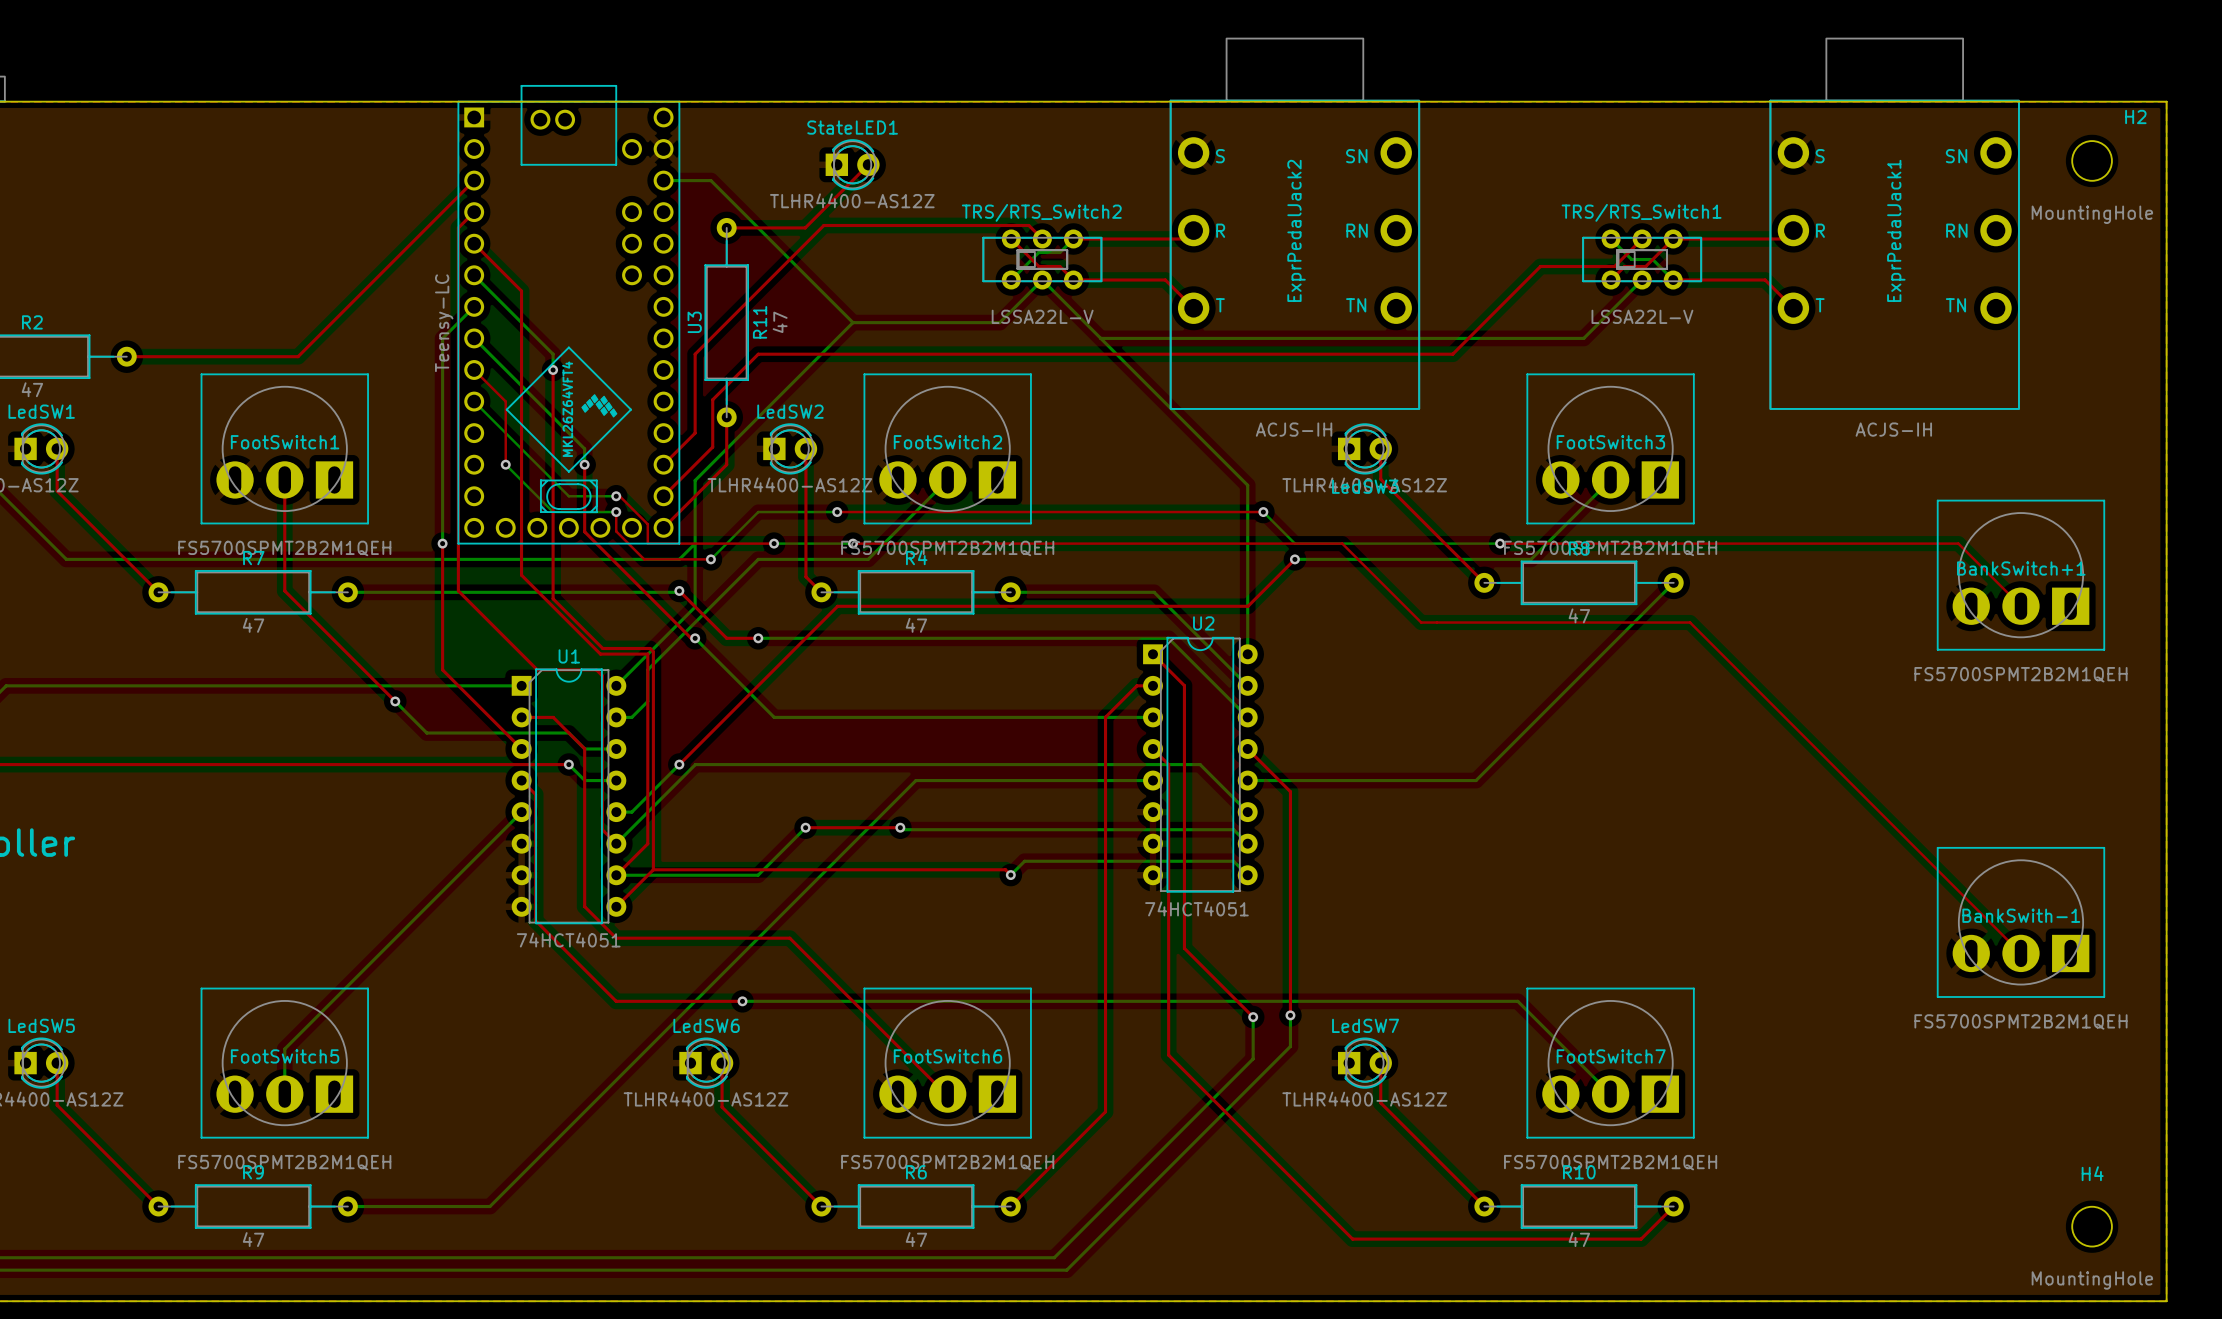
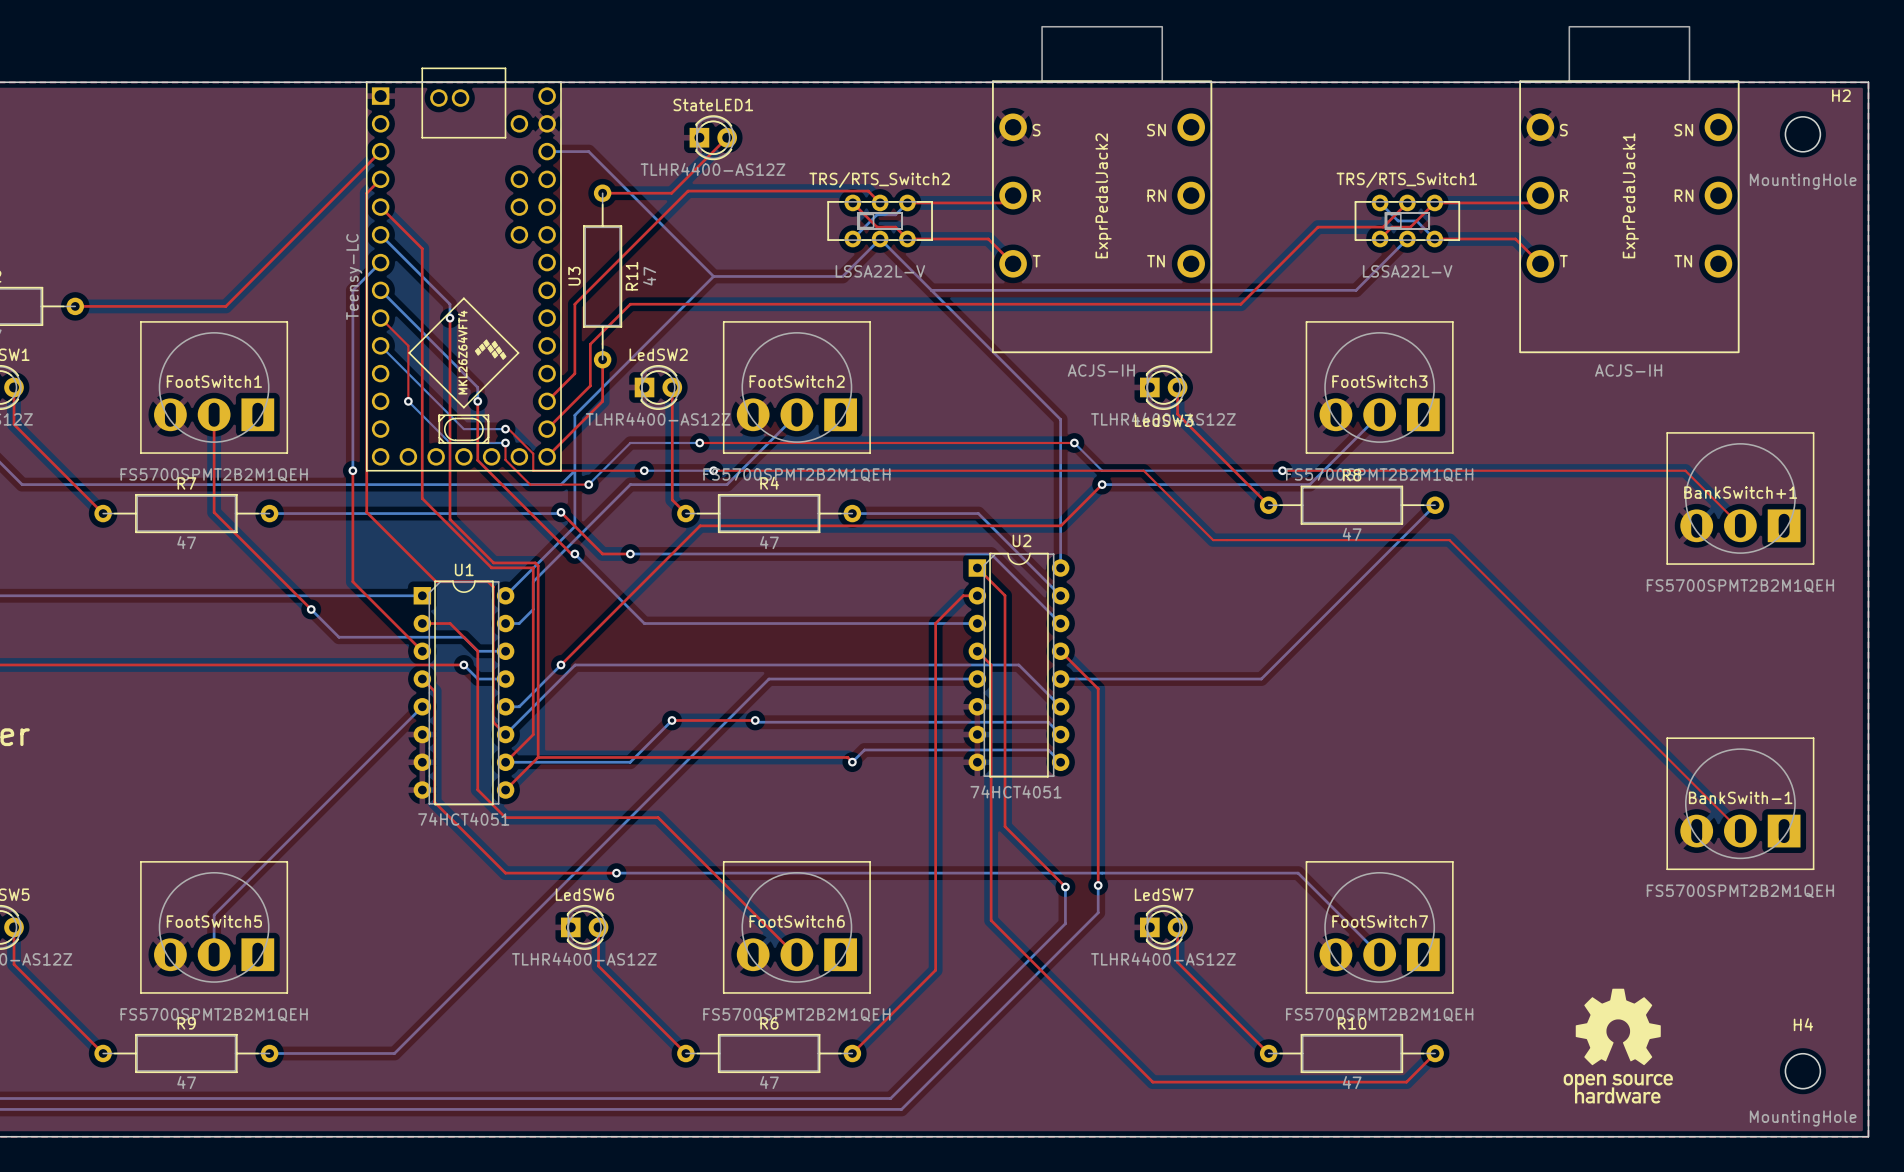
part: none -> (1618, 1046)

